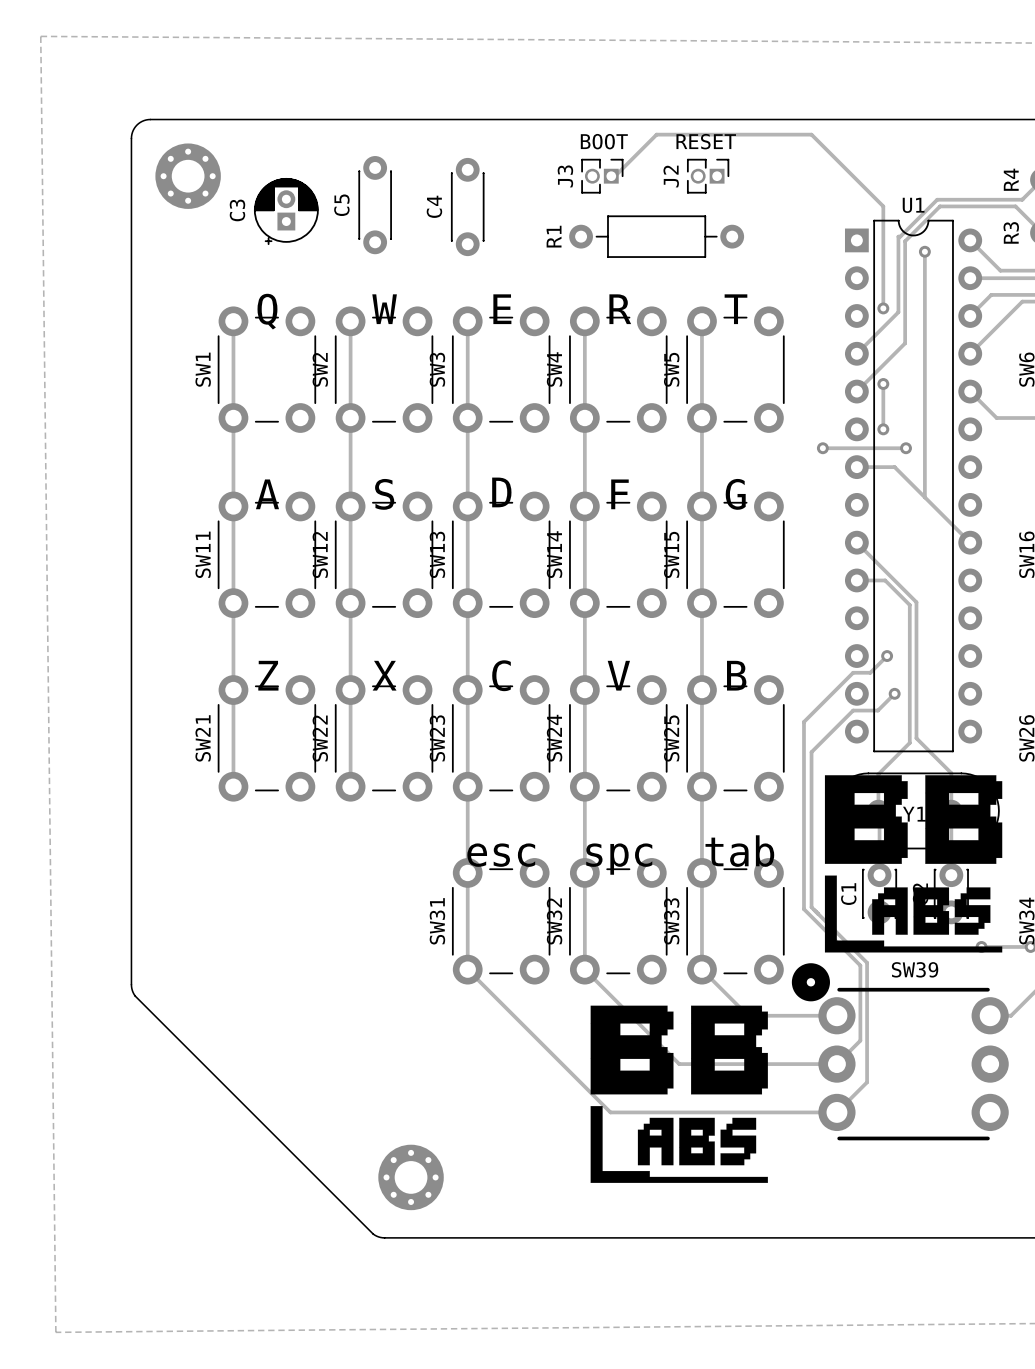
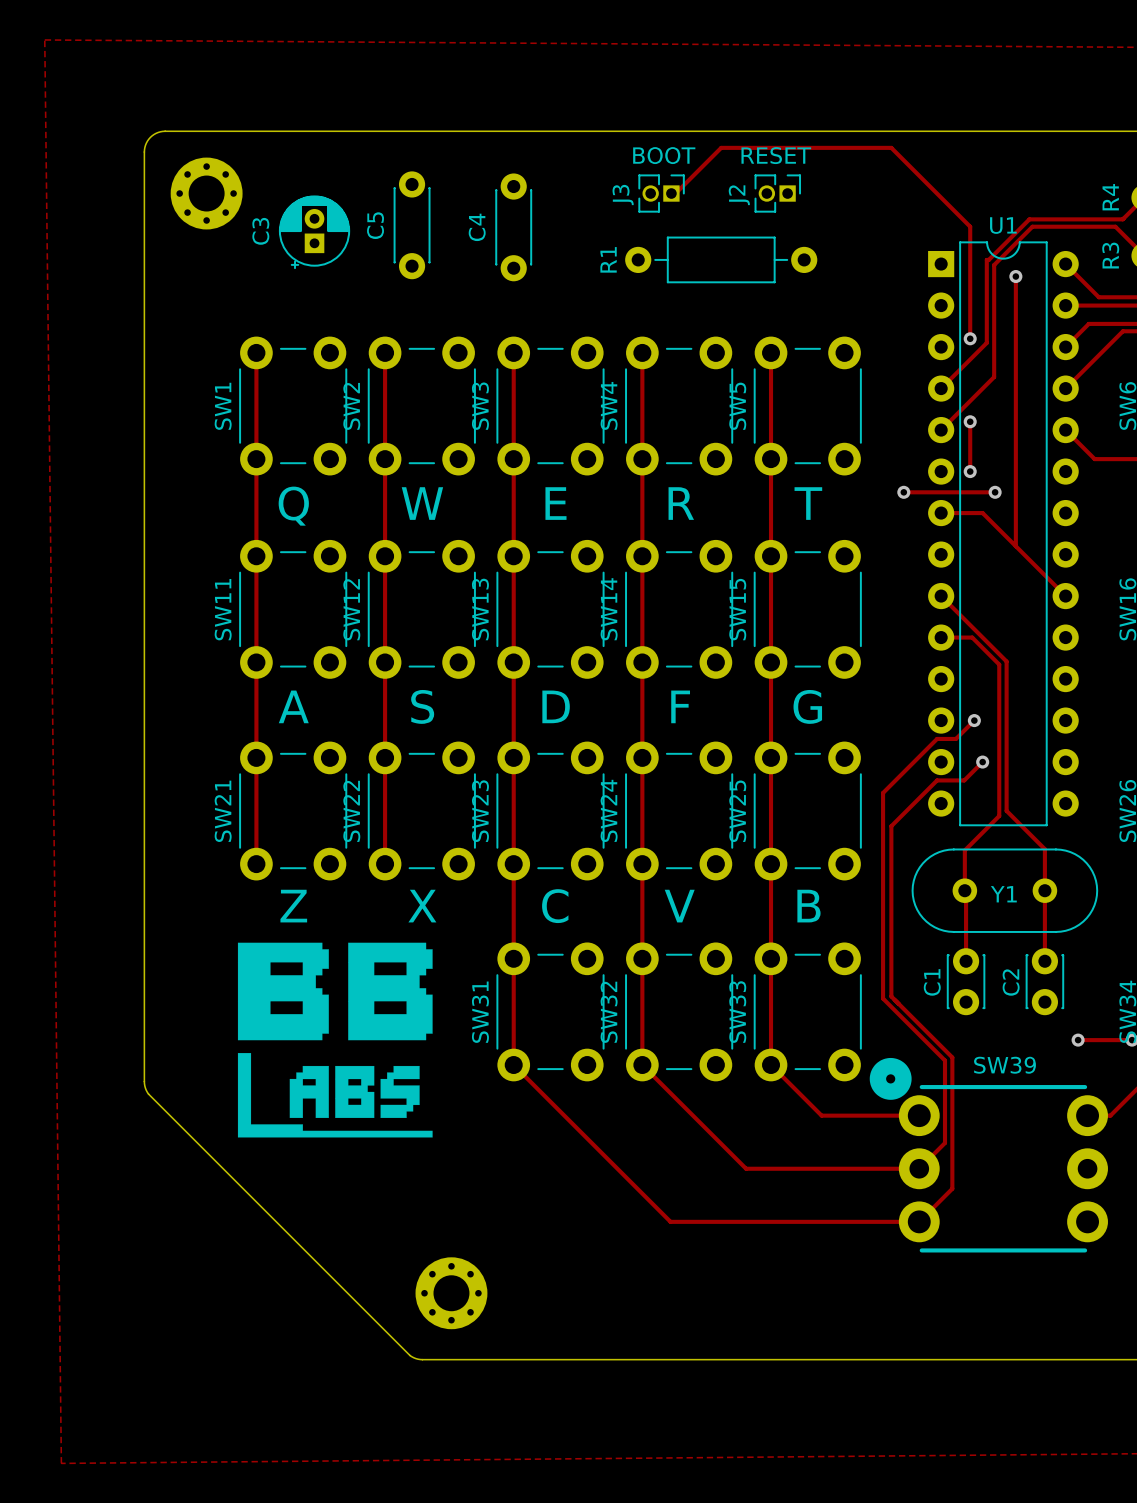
text position: W (384, 309) -> W (422, 503)
text position: E (502, 309) -> E (555, 503)
text position: R (620, 309) -> R (681, 503)
text position: T (735, 309) -> T (808, 503)
text position: Q (267, 311) -> Q (293, 506)
text position: D (501, 492) -> D (556, 706)
text position: A (267, 494) -> A (293, 706)
text position: S (384, 494) -> S (422, 706)
text position: F (619, 494) -> F (680, 706)
text position: G (735, 494) -> G (807, 706)
text position: Z (268, 675) -> Z (293, 906)
text position: X (384, 675) -> X (422, 906)
text position: C (501, 675) -> C (555, 906)
text position: V (618, 675) -> V (679, 906)
text position: B (736, 675) -> B (808, 906)
drawing: [824, 775, 1003, 953] -> none
text: tab (739, 851) -> none
text: esc (501, 855) -> none
drawing: none -> [237, 942, 433, 1138]
text: spc (619, 859) -> none
drawing: [590, 1005, 768, 1183] -> none

